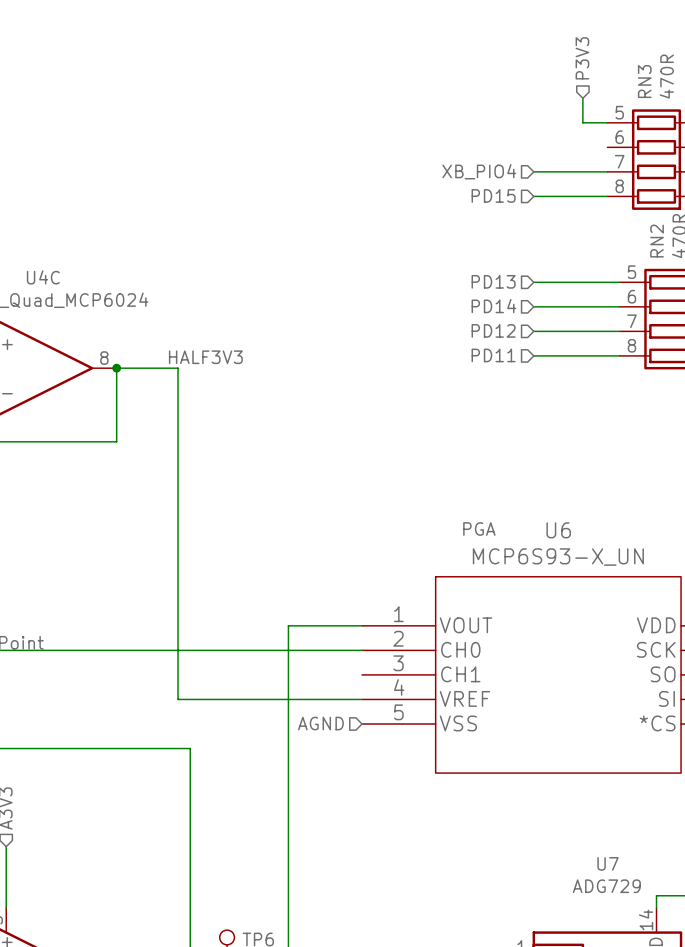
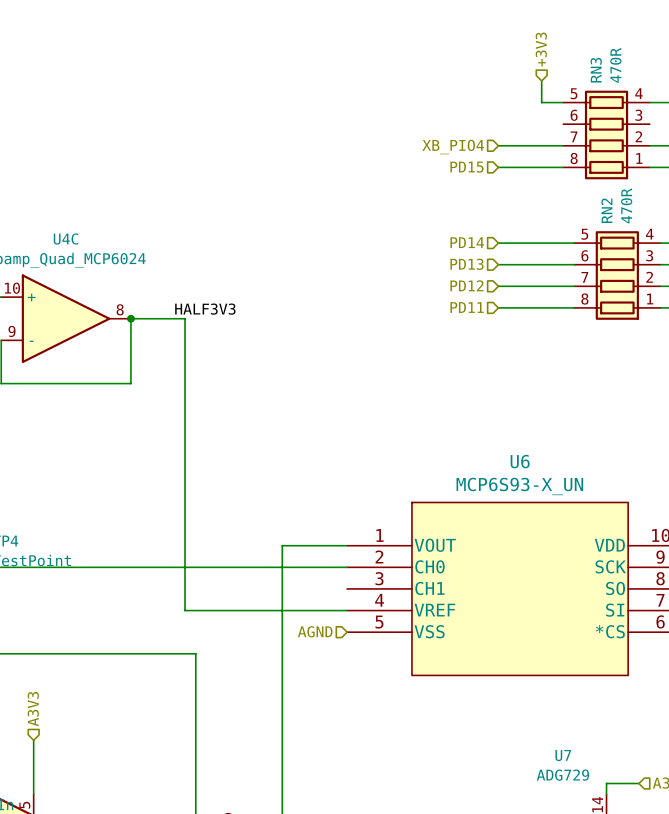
hierarchical label: P3V3 (582, 58) -> +3V3 (541, 49)
hierarchical label: PD13 (493, 281) -> PD14 (467, 242)
hierarchical label: PD14 (493, 306) -> PD13 (467, 264)
label: PGA (479, 529) -> none

